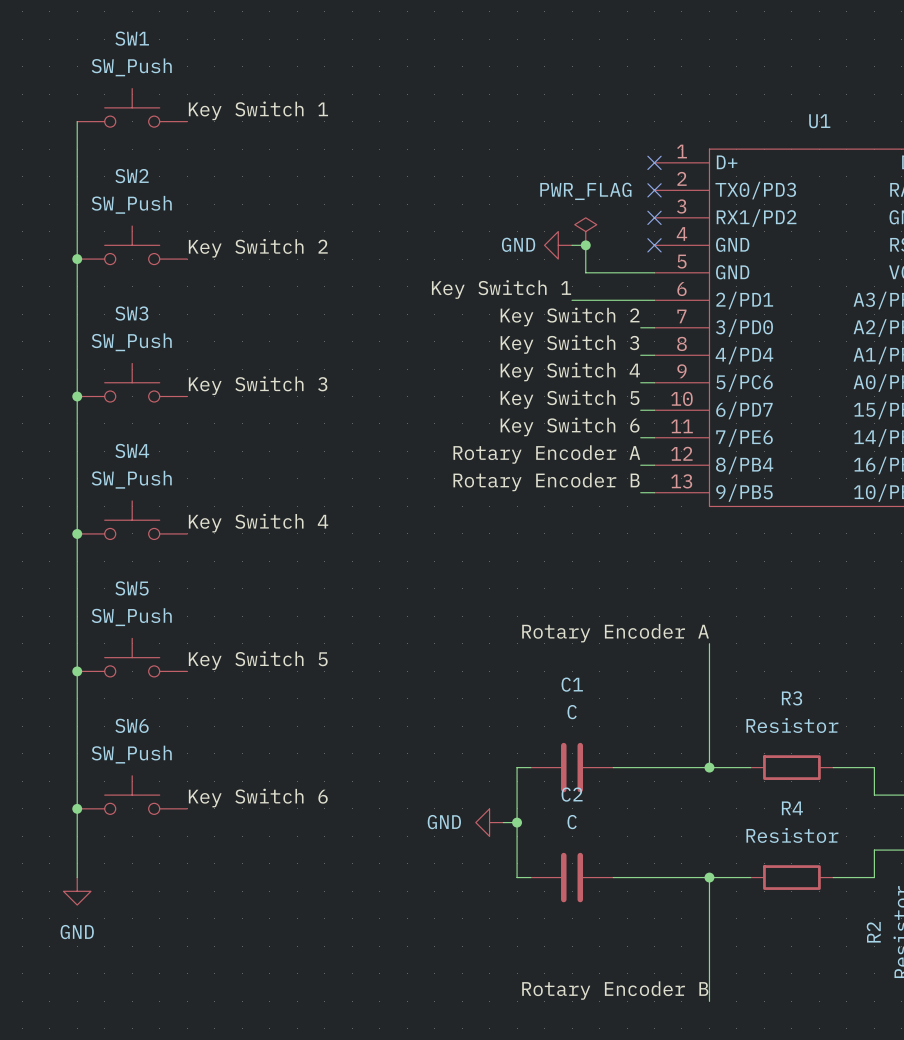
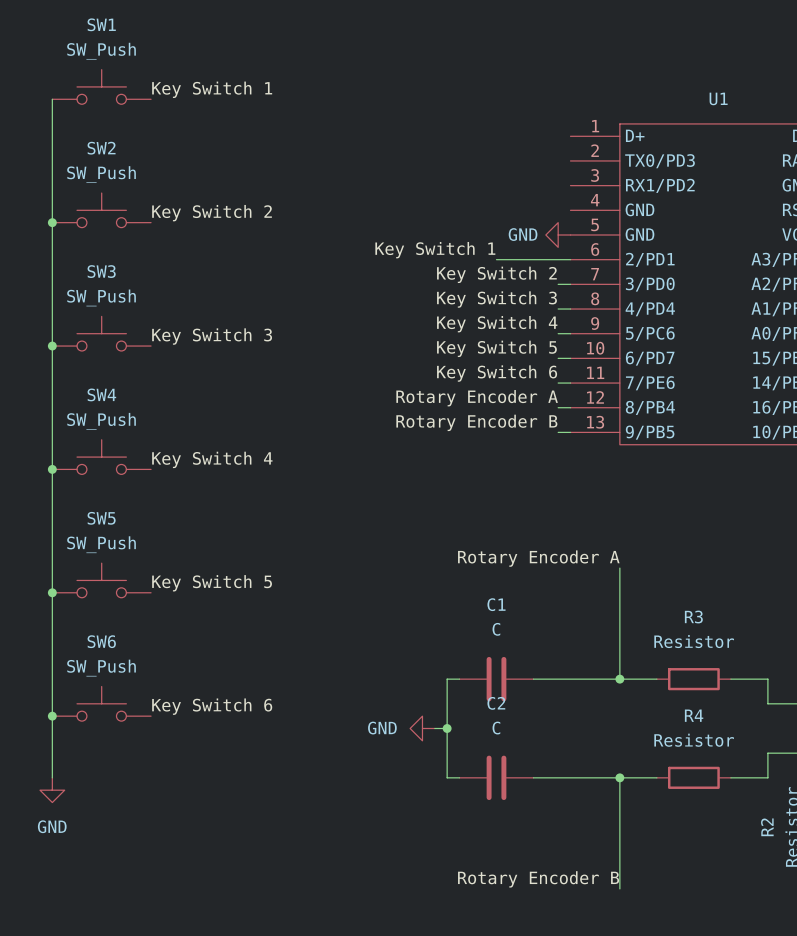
no-connect mark: (654, 162) -> none
no-connect mark: (654, 190) -> none
no-connect mark: (654, 217) -> none
power symbol: PWR_FLAG (585, 231) -> none
power symbol position: GND (558, 245) -> GND (558, 234)
wire: (572, 245) (585, 245) (585, 272) (654, 272) -> none
junction: (585, 245) -> none
no-connect mark: (654, 245) -> none

